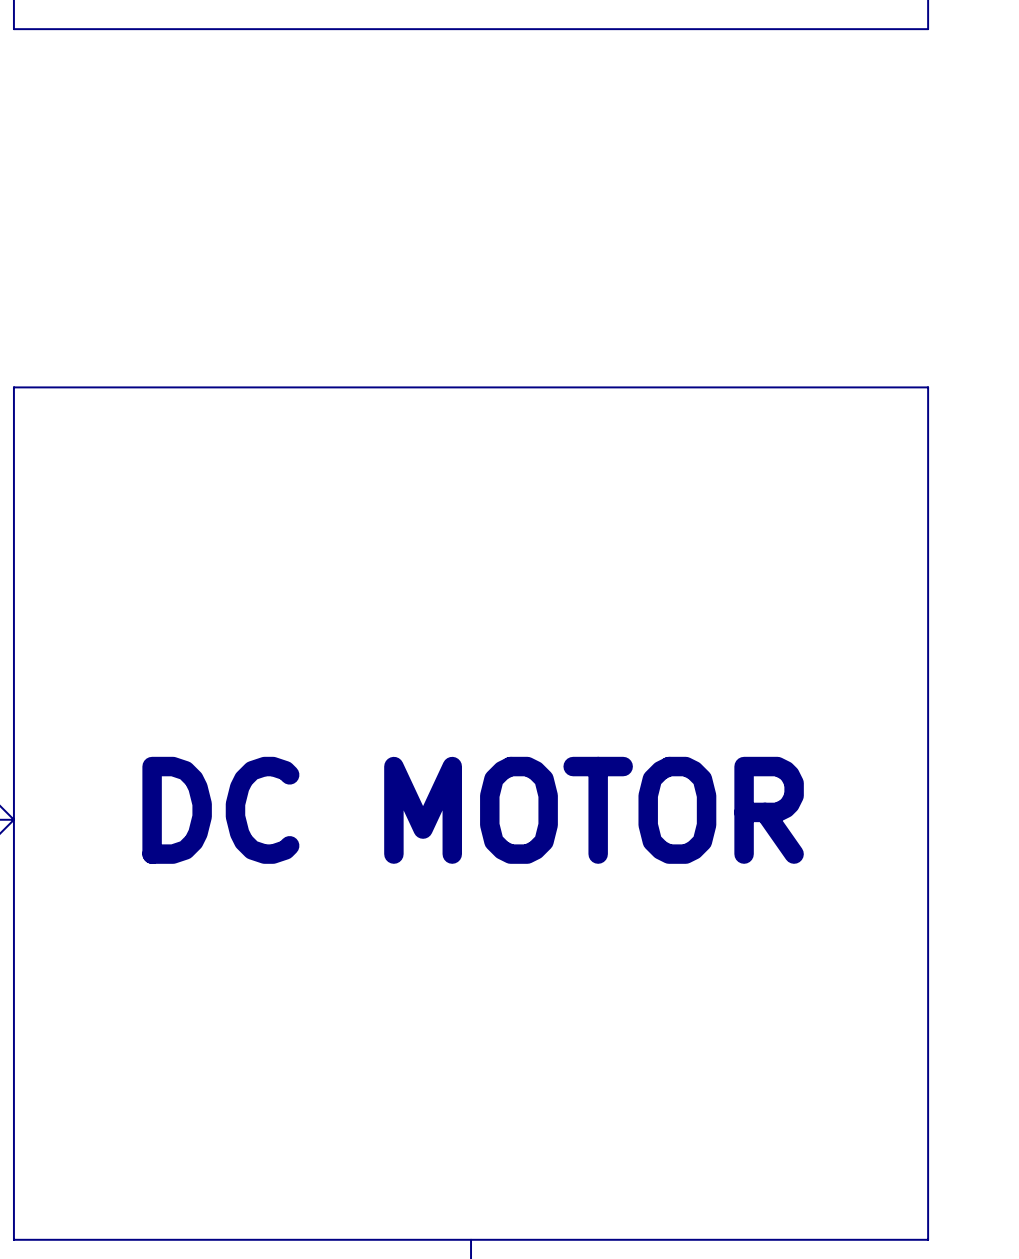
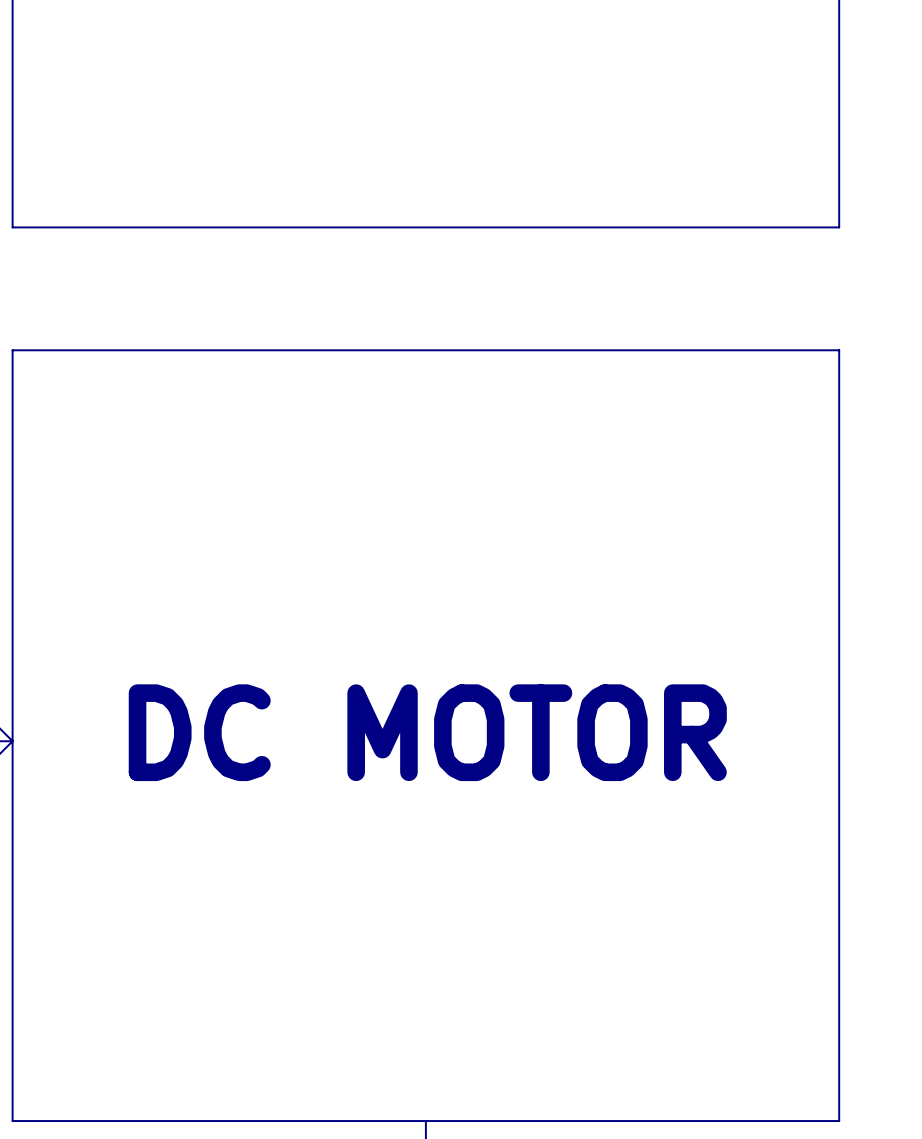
line: (13, 29) (928, 29) -> (12, 26) (12, 227) (839, 227) (839, 26)

